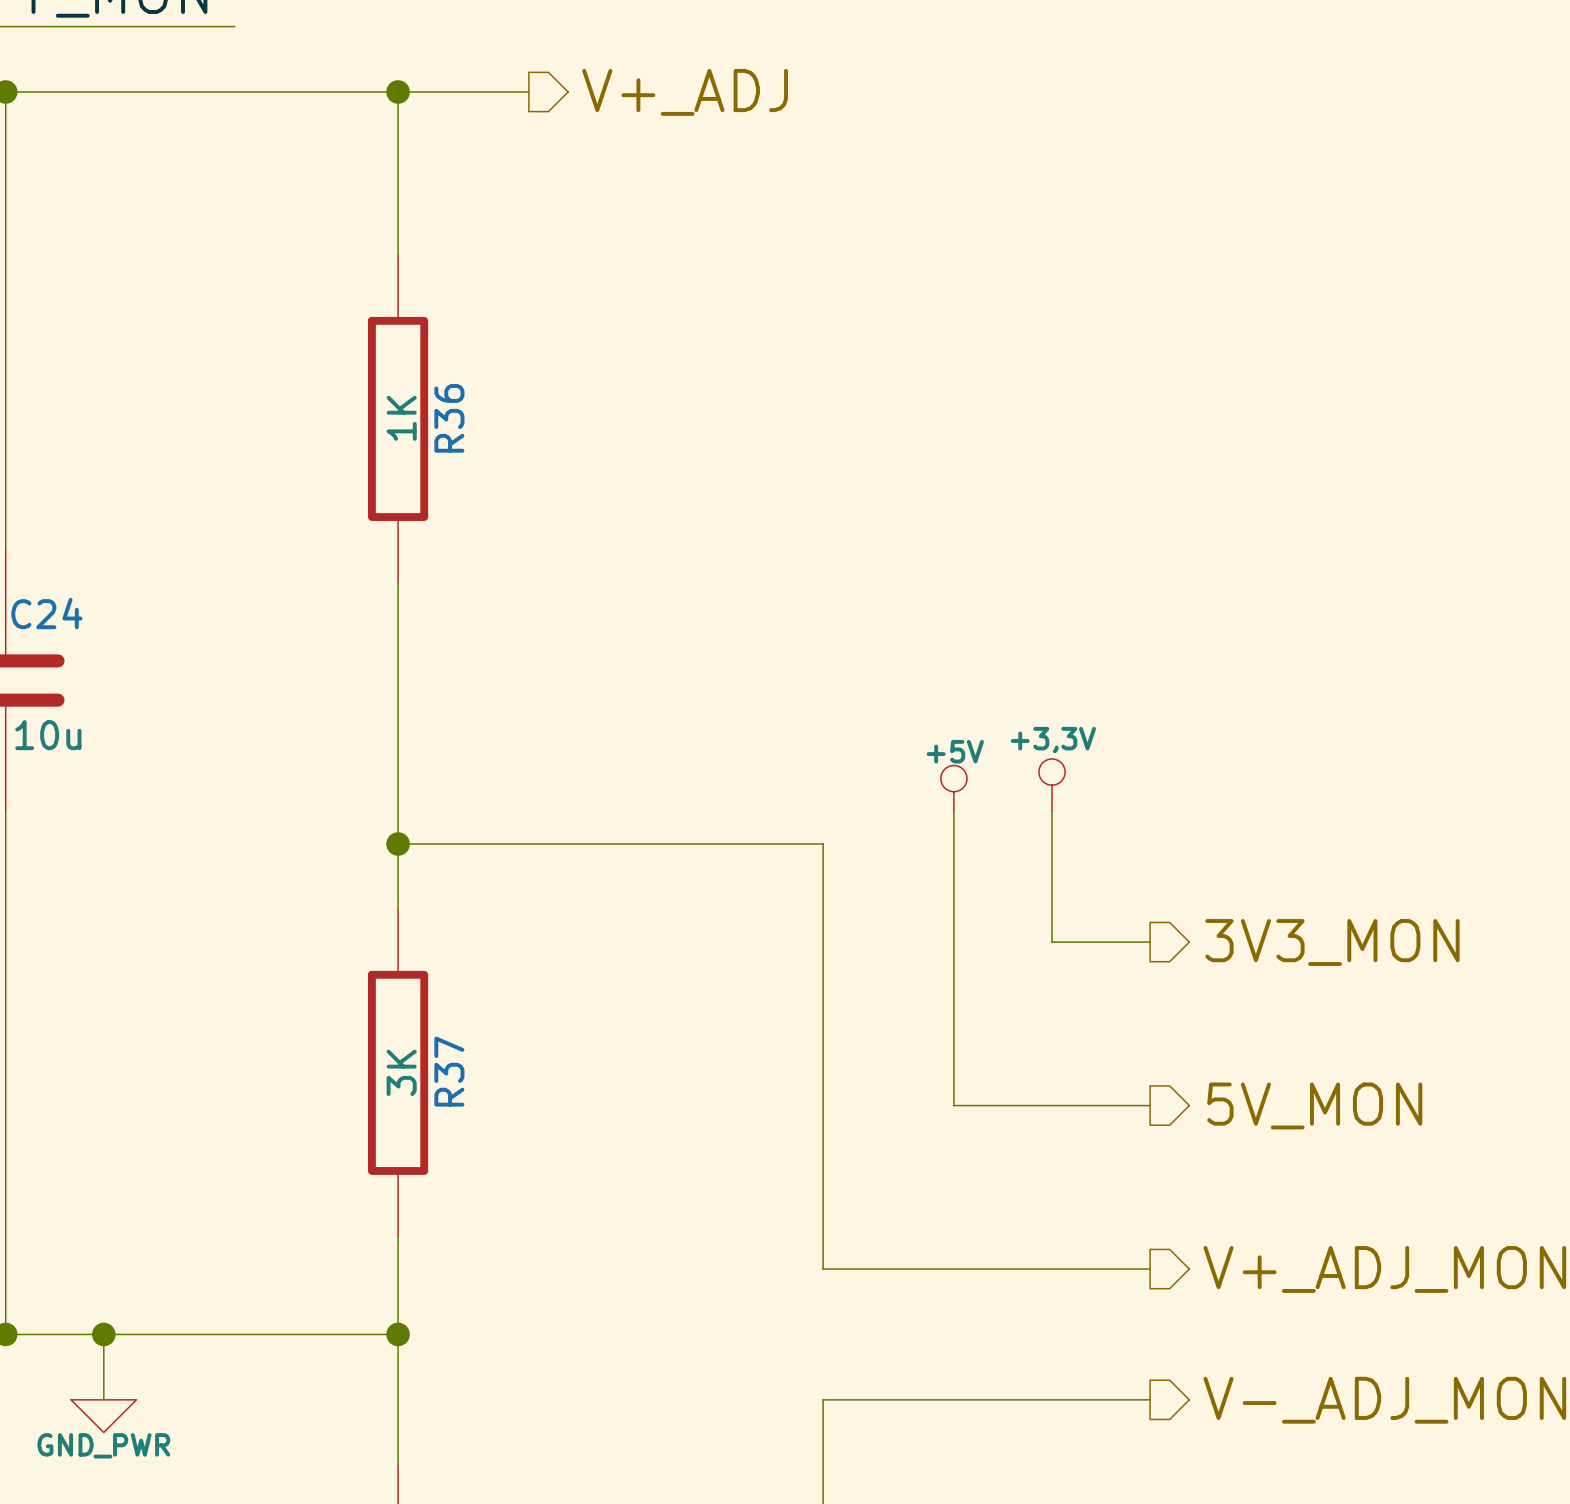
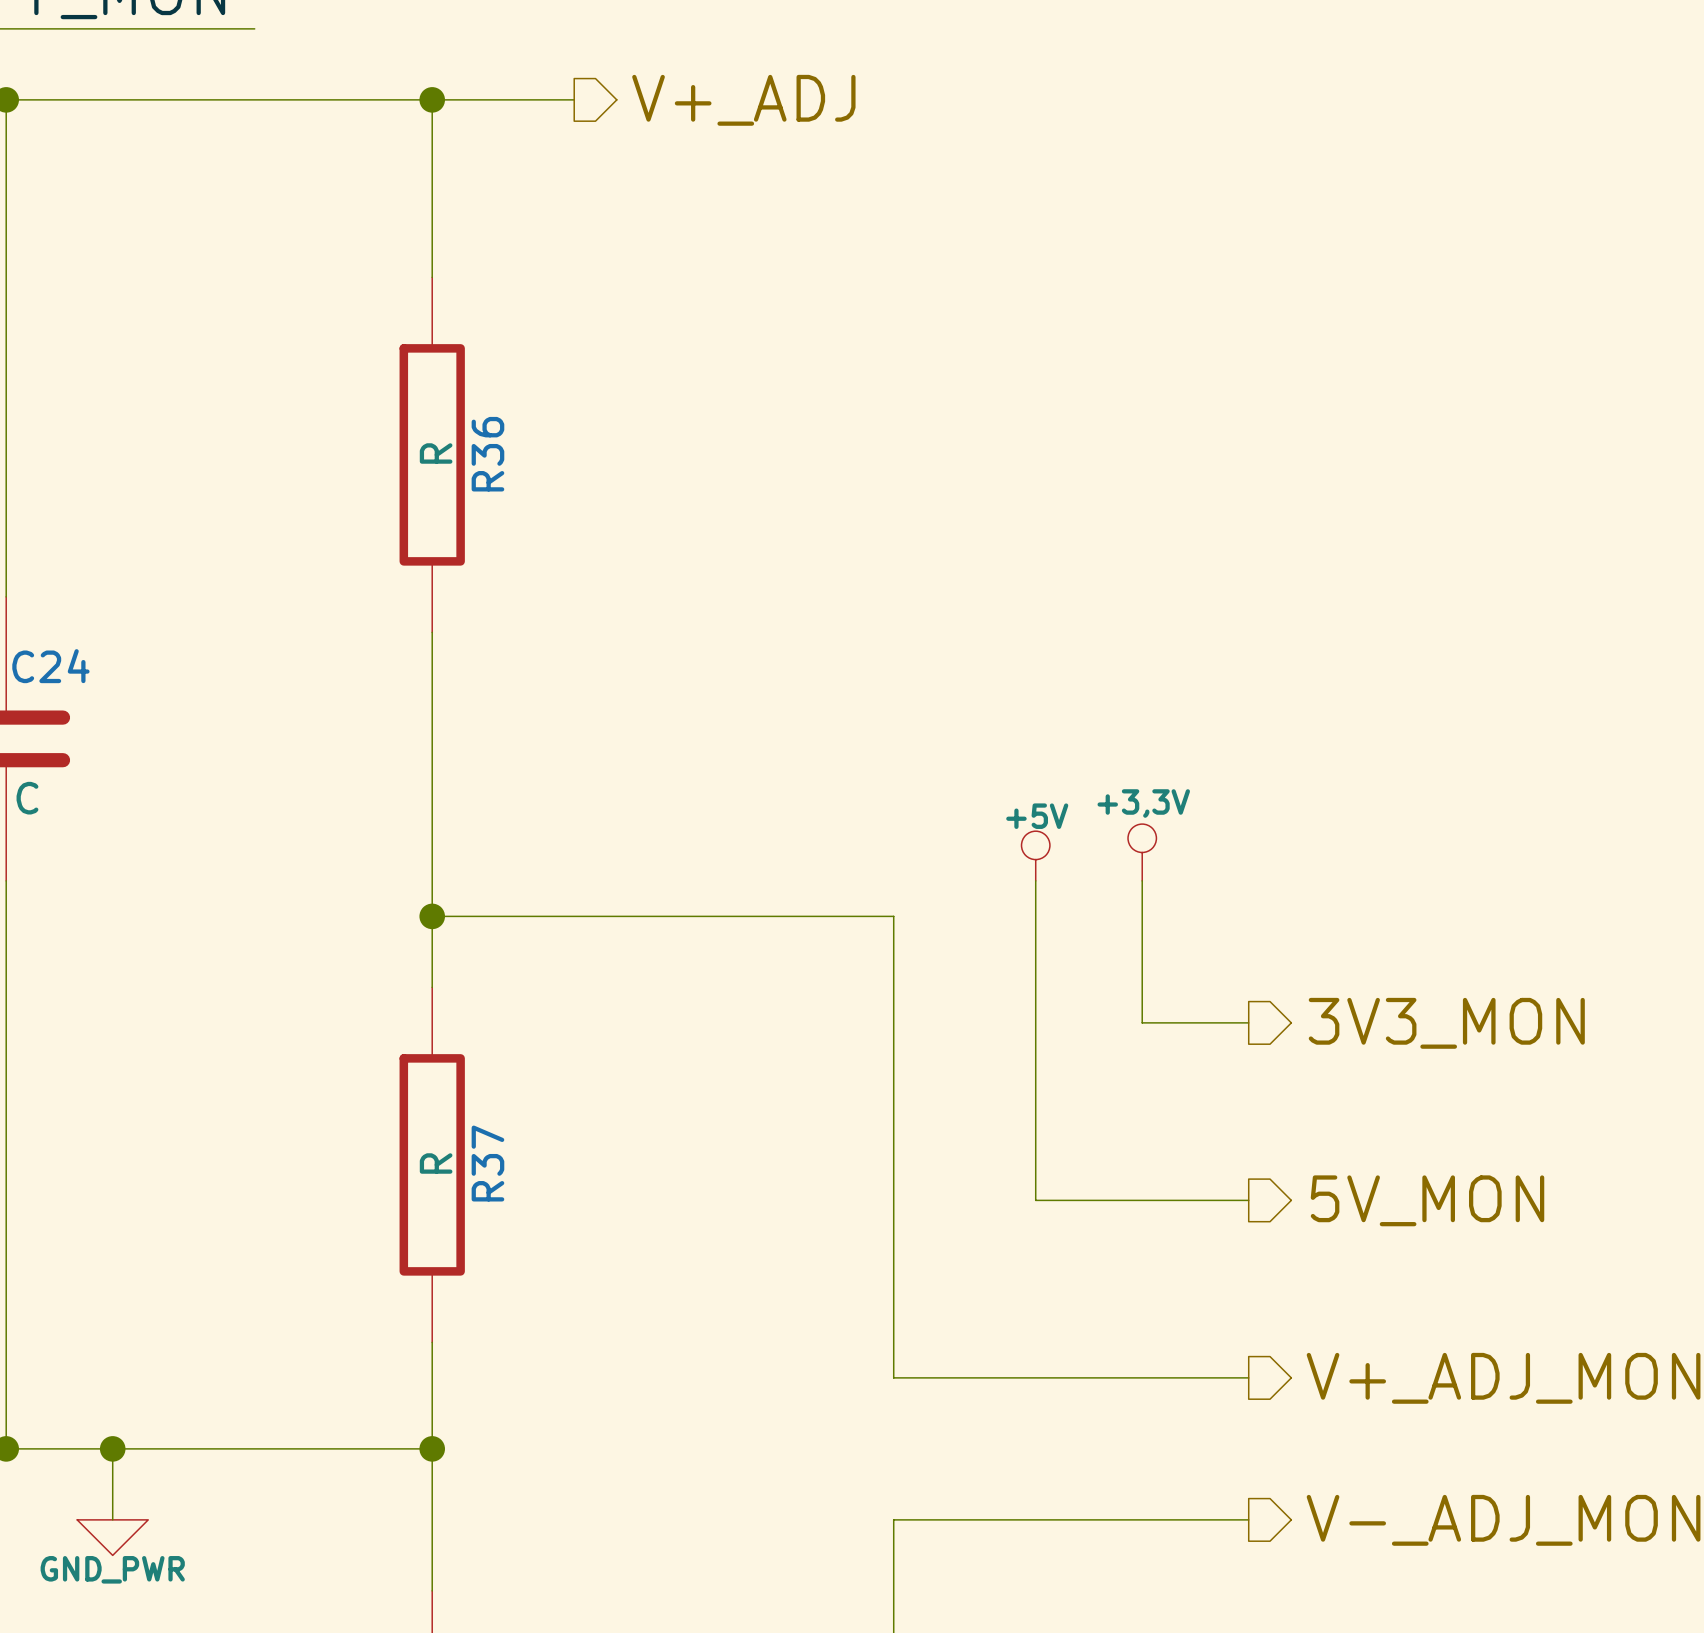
R36 value: 1K (401, 418) -> R (436, 453)
C24 value: 10u (48, 735) -> C (27, 798)
R37 value: 3K (401, 1072) -> R (436, 1163)

